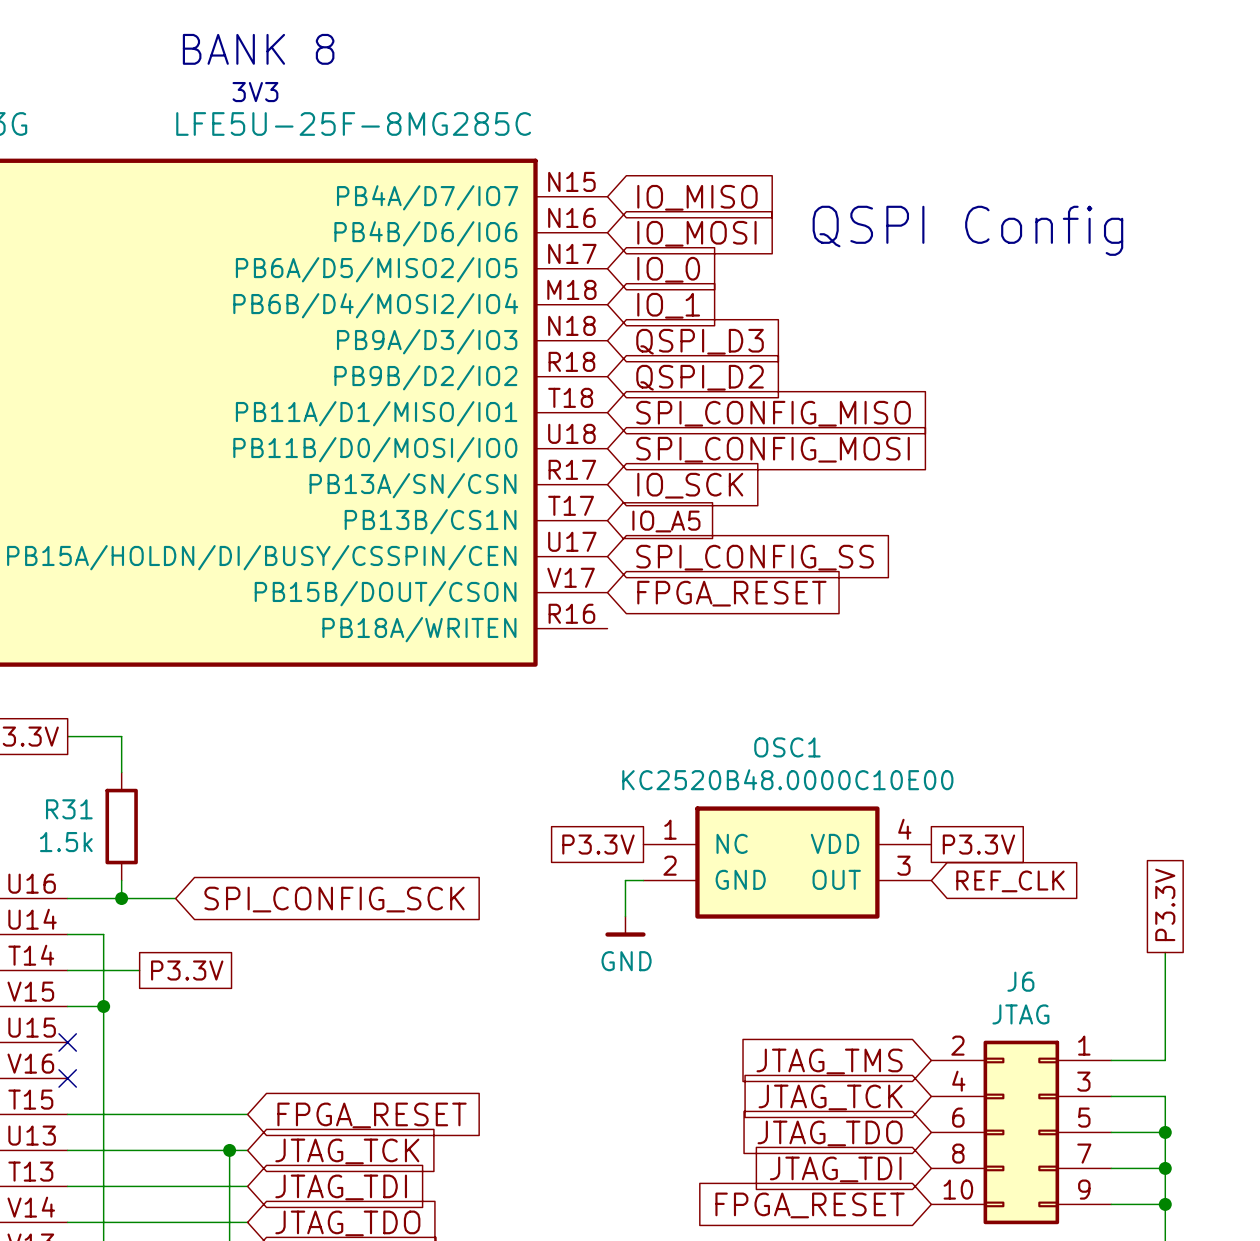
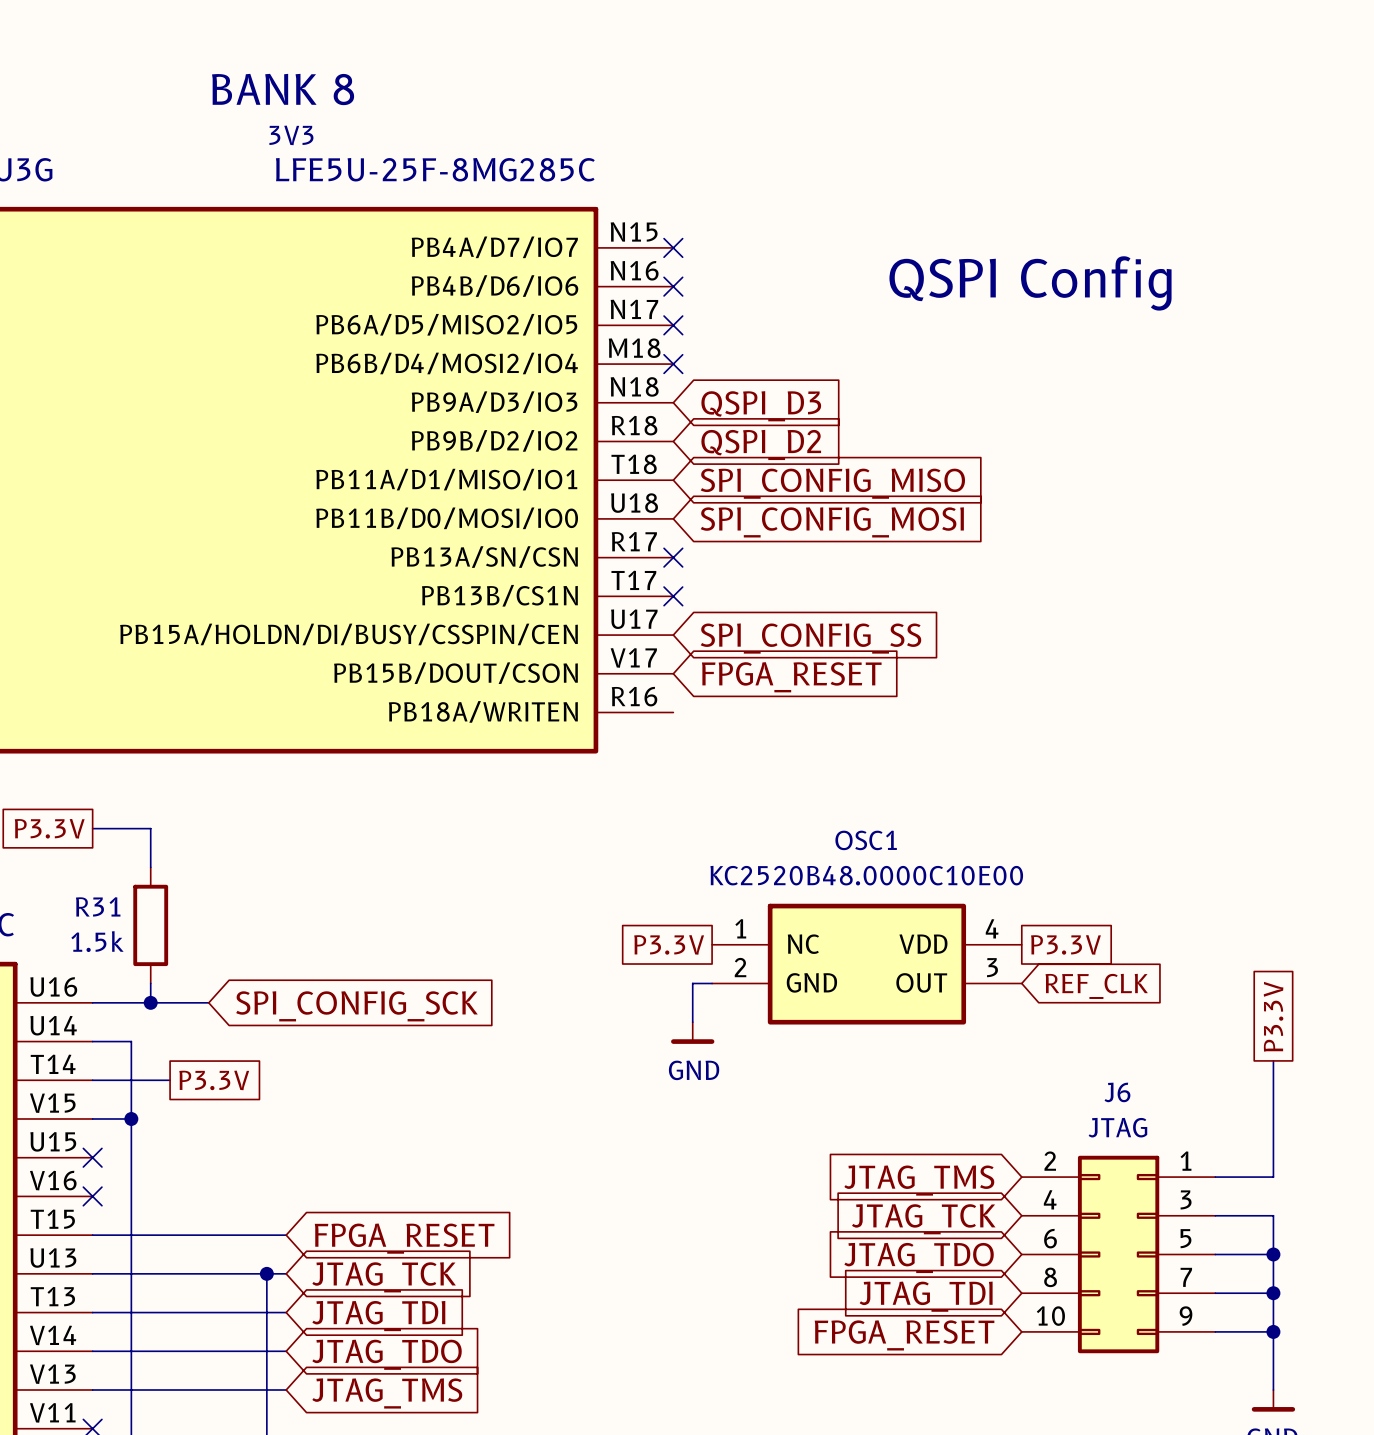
no-connect mark: none -> (673, 247)
global label: IO_MISO (697, 197) -> none
no-connect mark: none -> (673, 286)
global label: IO_MOSI (696, 233) -> none
no-connect mark: none -> (673, 325)
global label: IO_0 (668, 269) -> none
no-connect mark: none -> (673, 364)
global label: IO_1 (668, 305) -> none
no-connect mark: none -> (673, 557)
global label: IO_SCK (690, 485) -> none
no-connect mark: none -> (673, 596)
global label: IO_A5 (666, 521) -> none

